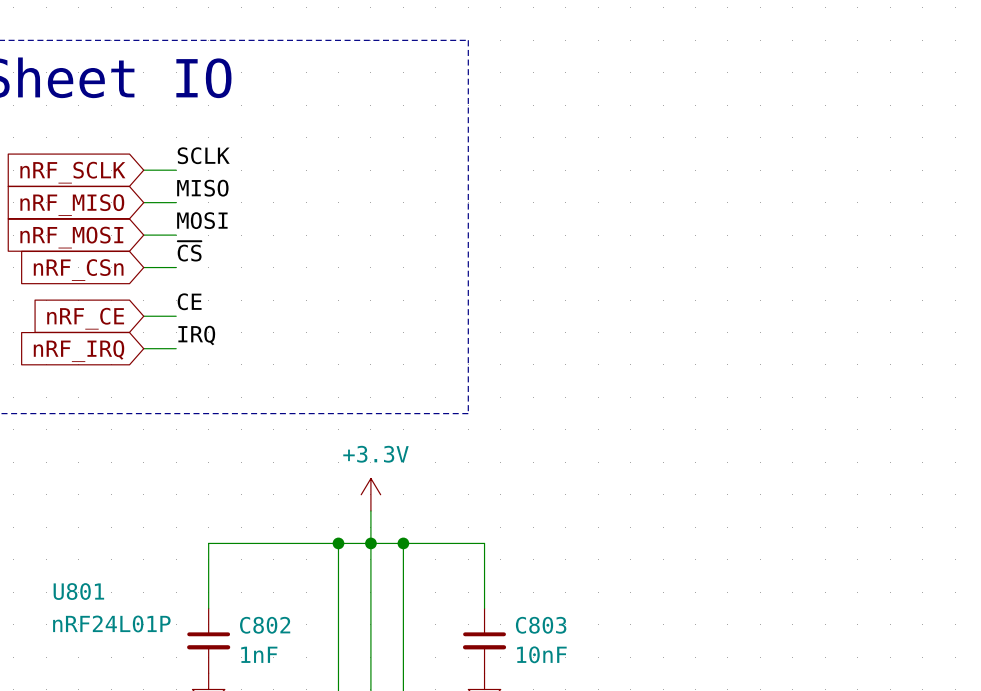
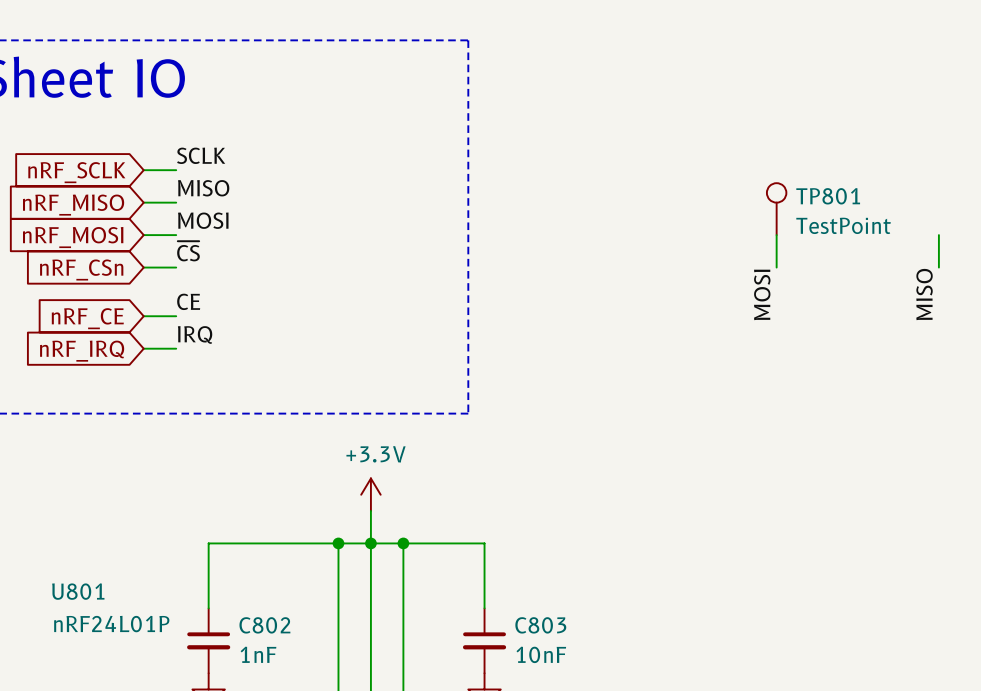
TP801: none -> TestPoint (776, 209)
wire: none -> (776, 235) (776, 267)
wire: none -> (938, 235) (938, 267)
label: none -> MOSI (762, 294)
label: none -> MISO (924, 294)

